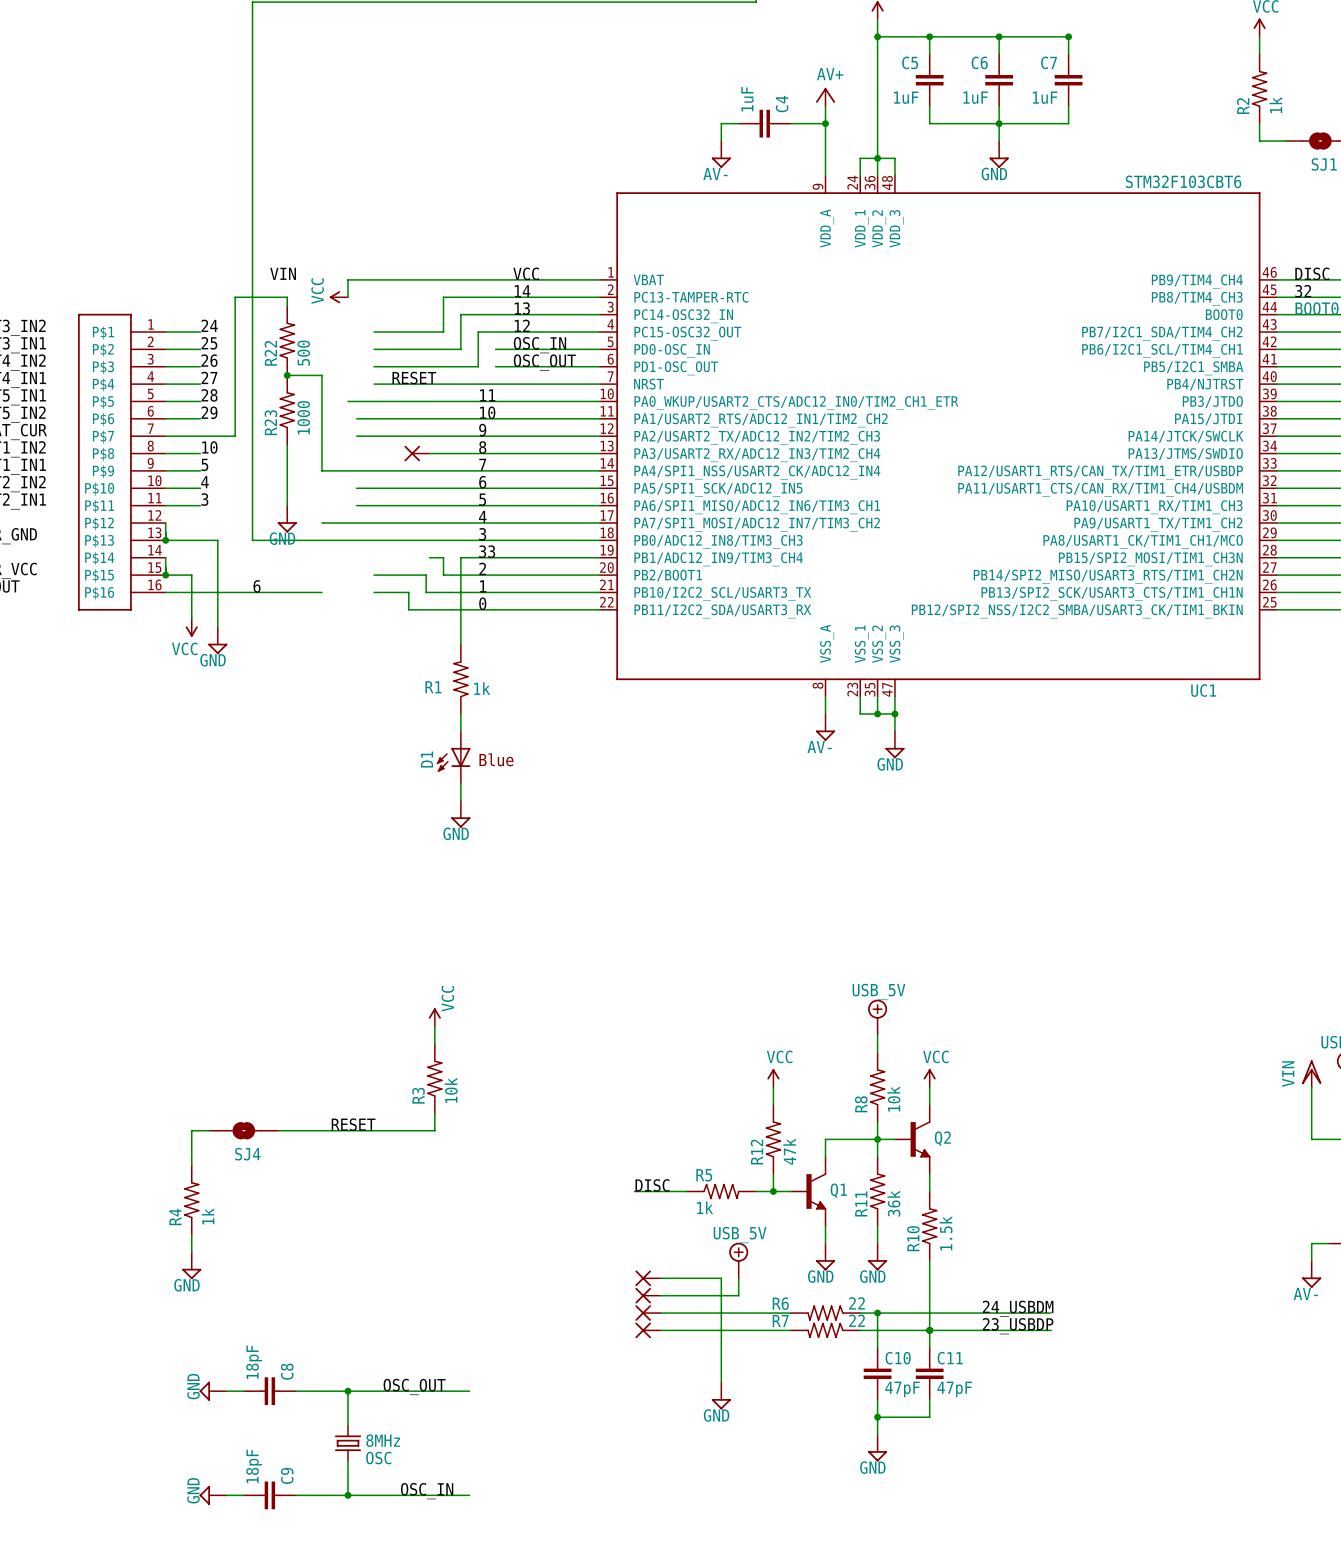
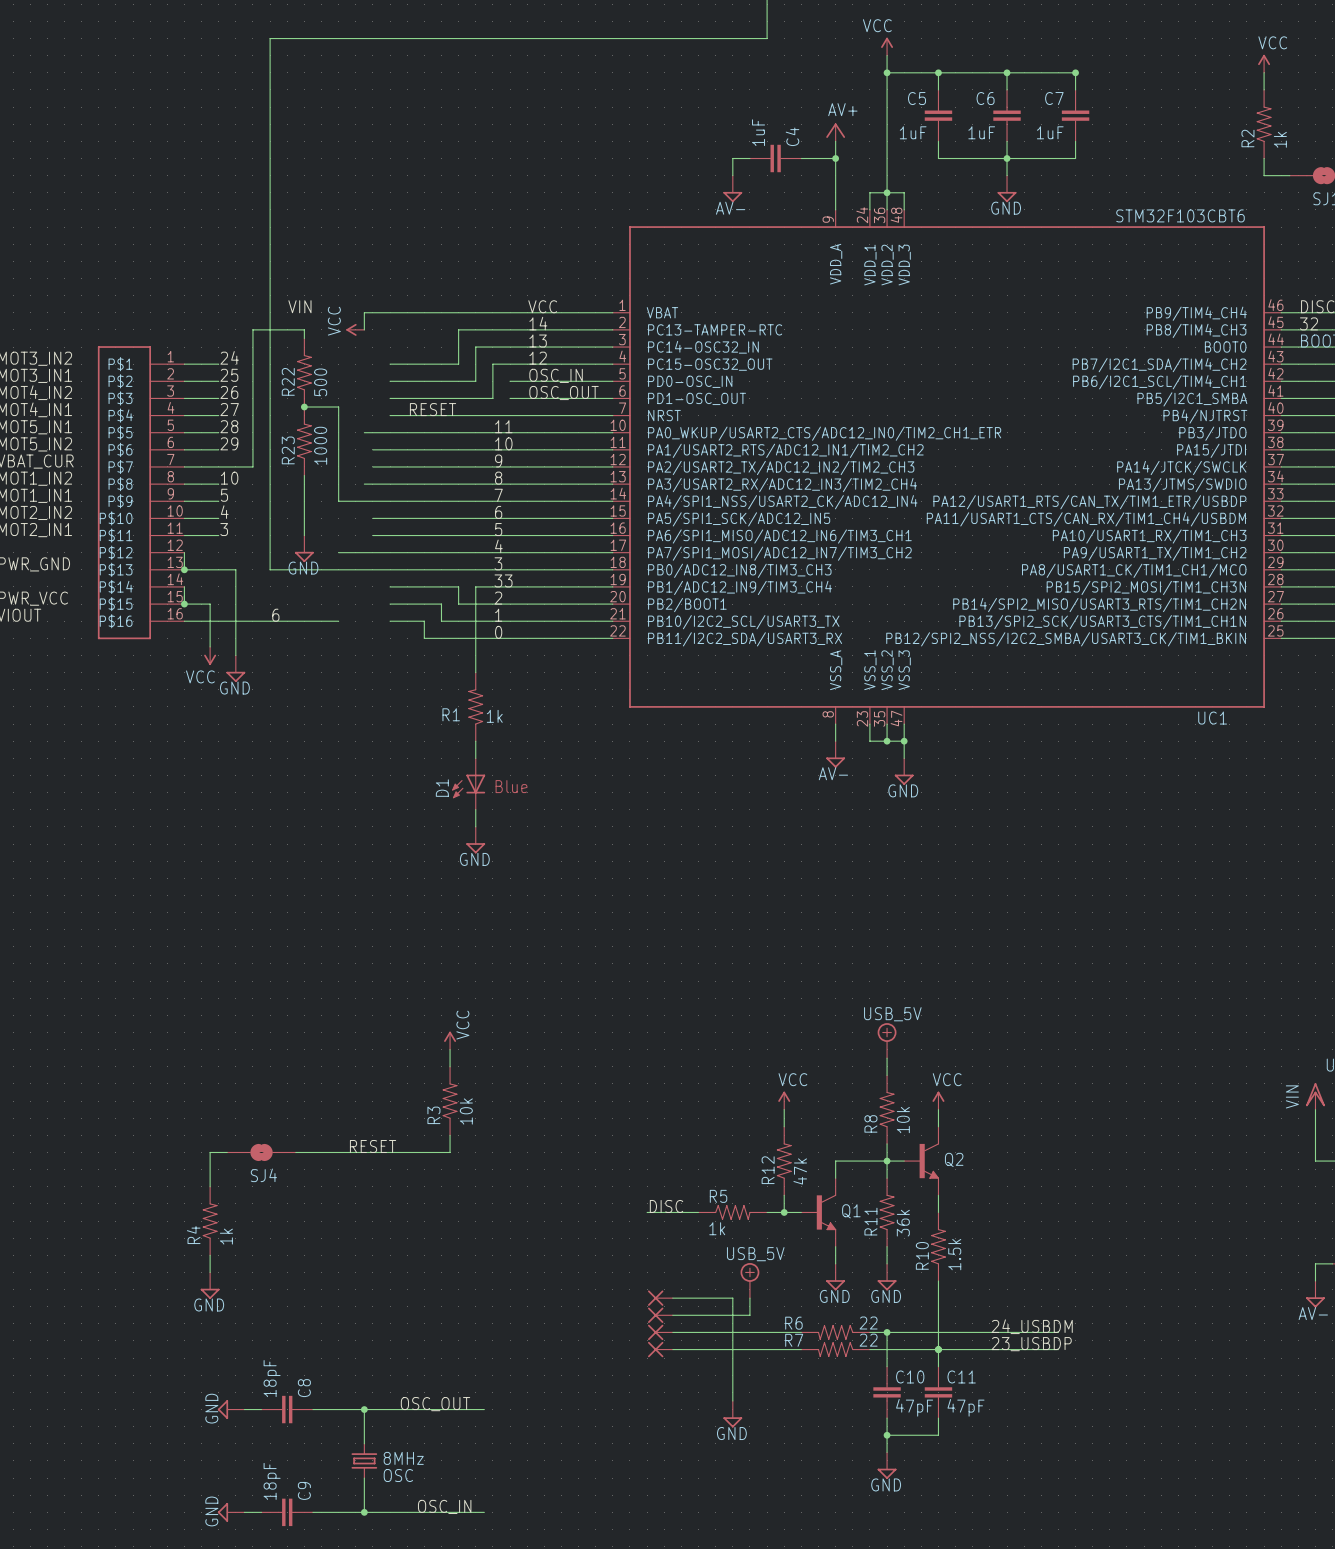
wire: none -> (364, 484) (444, 484)
part: (417, 453) -> none
wire: none -> (390, 586) (444, 586)

